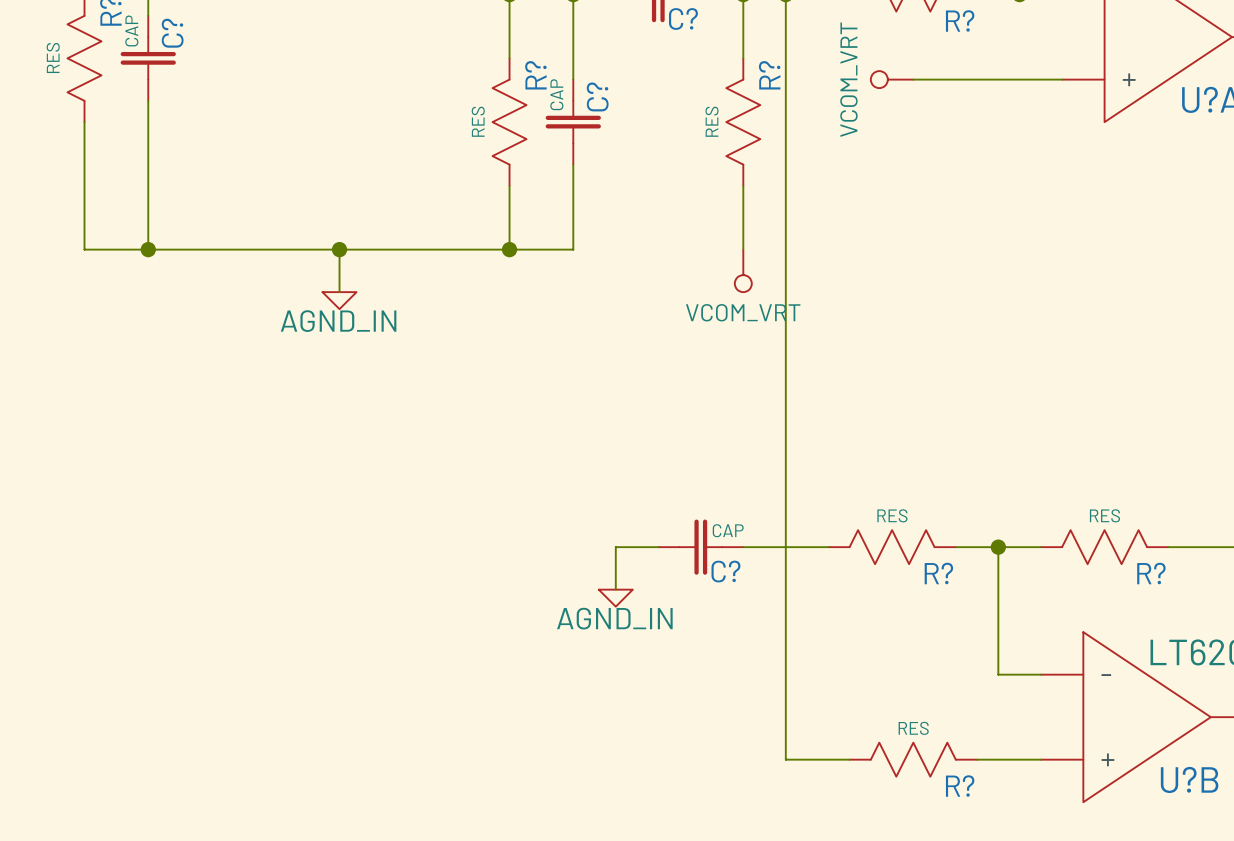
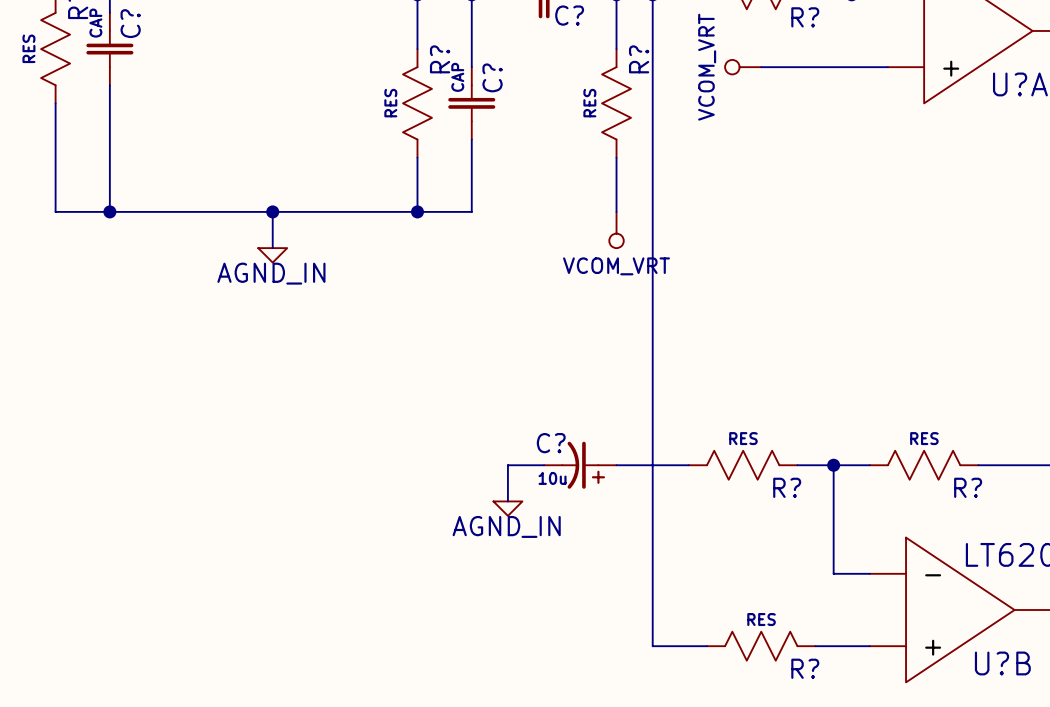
C? symbol: [658, 519, 744, 575] -> [544, 441, 617, 489]
C? value: CAP (728, 530) -> 10u (552, 478)
C? name position: C? (725, 571) -> C? (551, 443)

